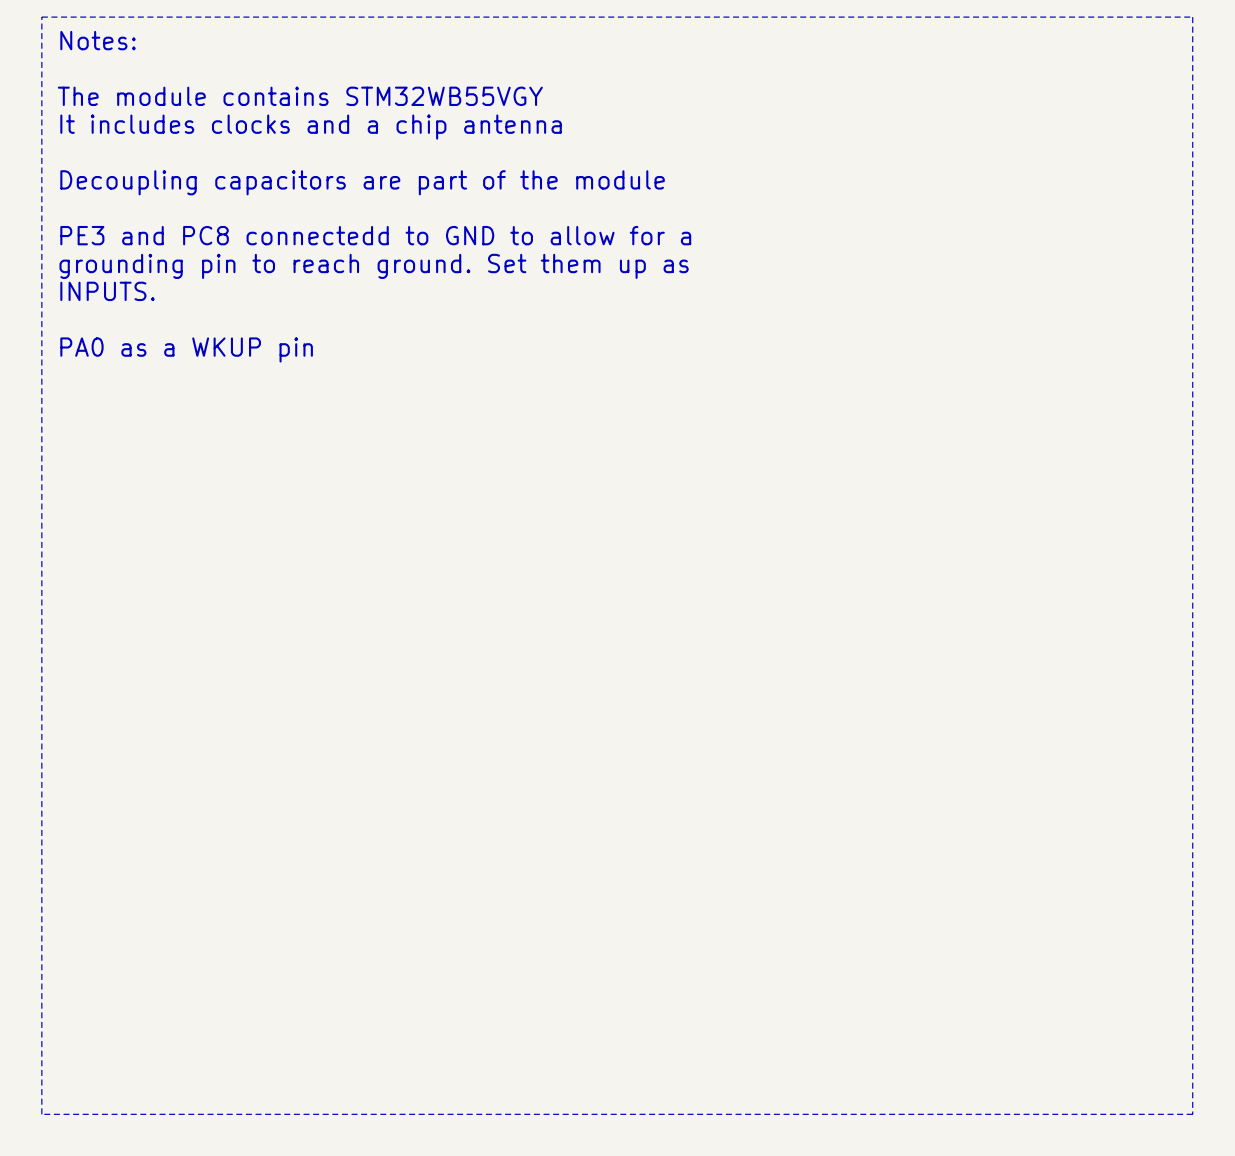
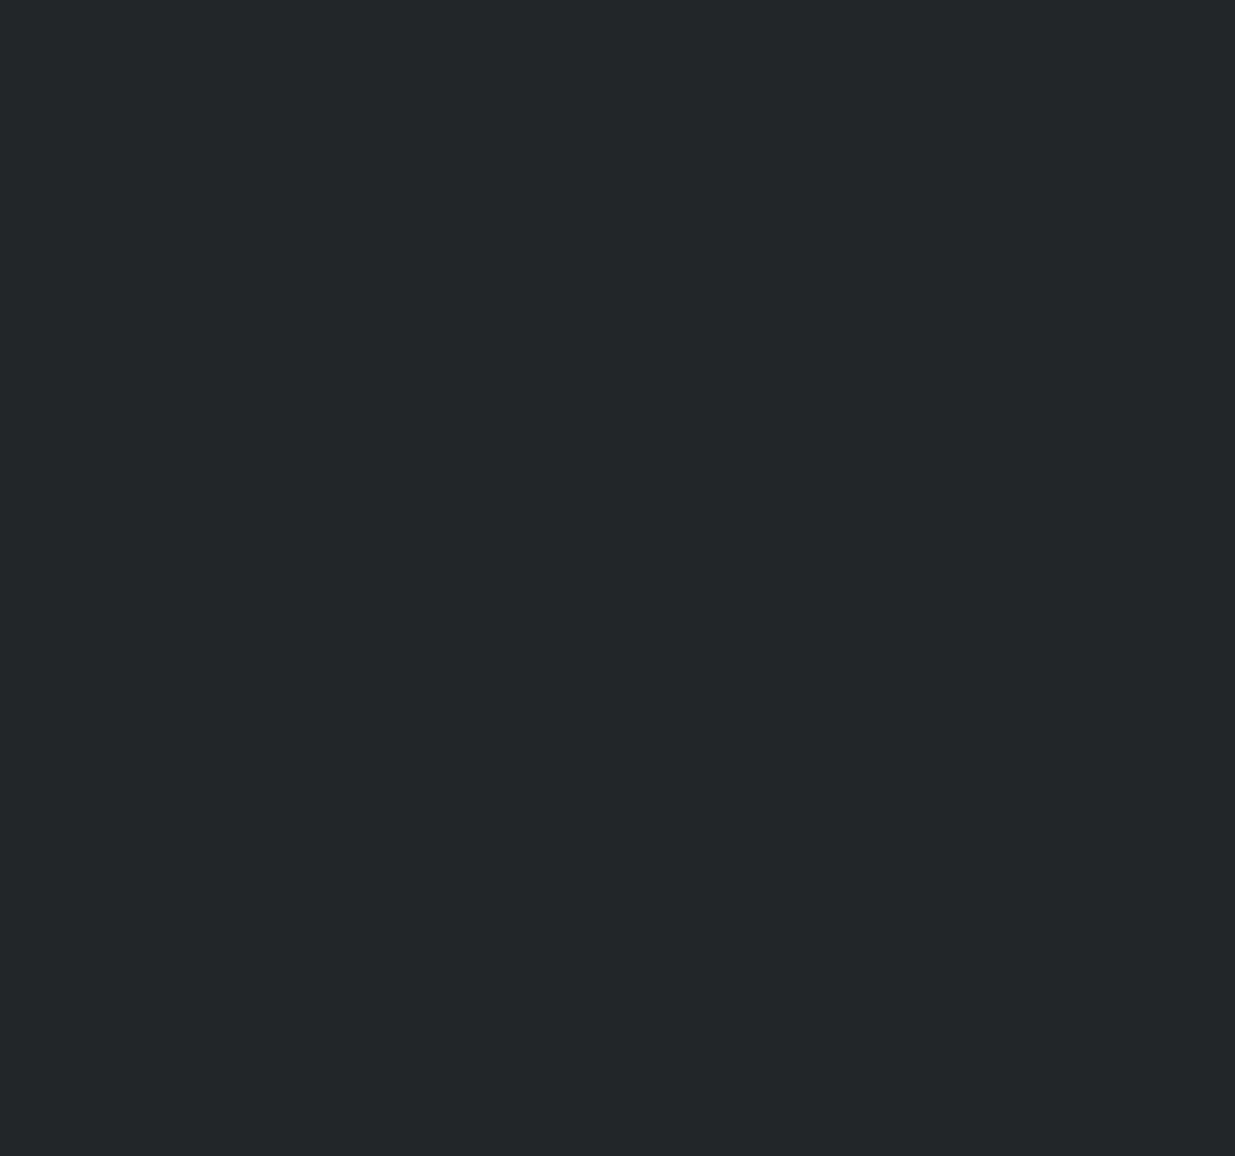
line: (41, 17) (1192, 17) (1192, 1114) (41, 1114) (41, 17) -> none
text: Notes: (98, 40) -> none
text: The module contains STM32WB55VGY (300, 96) -> none
text: It includes clocks and a chip antenna (311, 127) -> none
text: Decoupling capacitors are part of the module (362, 182) -> none
text: PE3 and PC8 connectedd to GND to allow for a (375, 235) -> none
text: grounding pin to reach ground. Set them up as (374, 266) -> none
text: INPUTS. (107, 291) -> none
text: PA0 as a WKUP pin (186, 349) -> none

